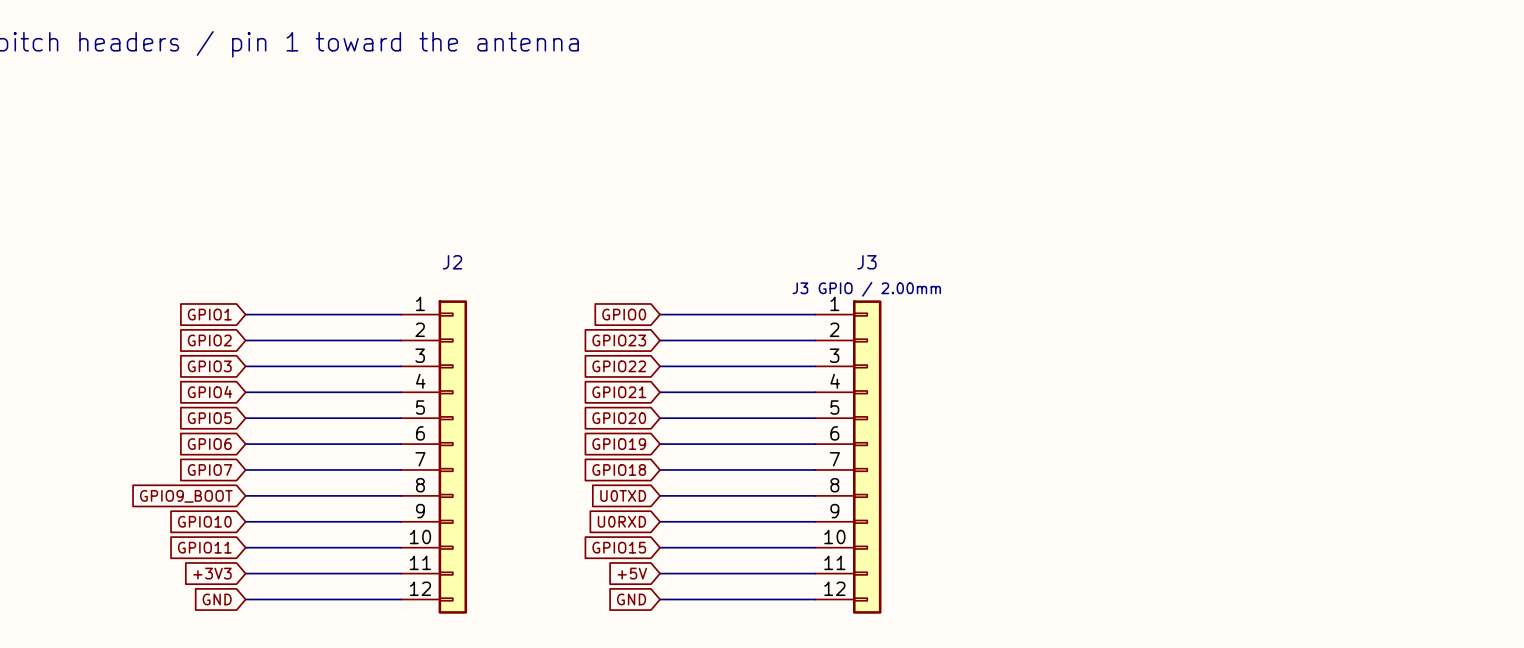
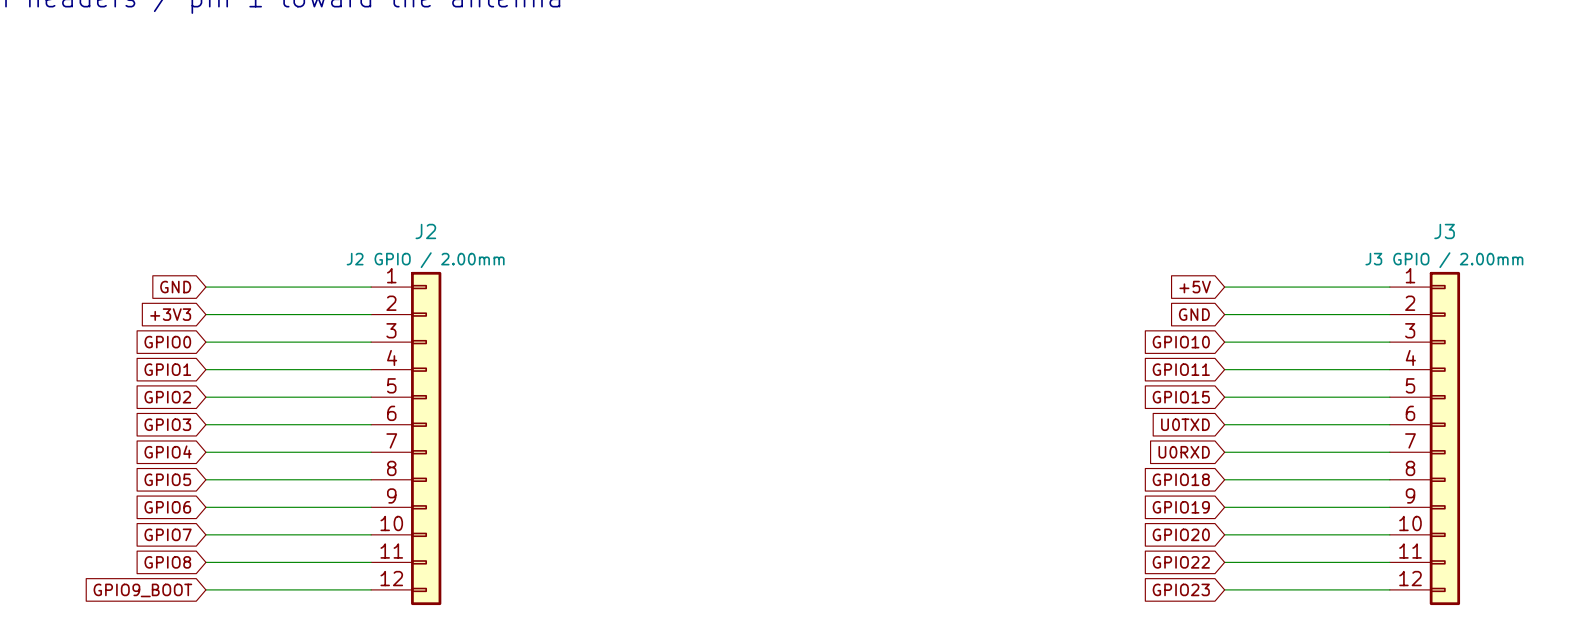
J2 value: none -> J2 GPIO / 2.00mm (425, 260)
global label: GPIO1 (209, 314) -> GND (175, 287)
global label: GPIO0 (624, 314) -> none
wire: (660, 314) (815, 314) -> none
global label: none -> +5V (1195, 287)
wire: none -> (1224, 287) (1389, 287)
global label: GPIO2 (209, 340) -> +3V3 (170, 314)
global label: GPIO23 (619, 340) -> none
wire: (660, 340) (815, 340) -> none
global label: none -> GND (1194, 314)
wire: none -> (1224, 314) (1389, 314)
global label: GPIO3 (209, 366) -> GPIO0 (167, 342)
global label: GPIO22 (619, 366) -> none
wire: (660, 366) (815, 366) -> none
global label: none -> GPIO10 (1181, 342)
wire: none -> (1224, 342) (1389, 342)
global label: GPIO4 (210, 392) -> GPIO1 (167, 369)
global label: GPIO21 (619, 392) -> none
wire: (660, 392) (815, 392) -> none
global label: none -> GPIO11 (1181, 369)
wire: none -> (1224, 369) (1389, 369)
global label: GPIO5 (209, 418) -> GPIO2 (167, 397)
global label: GPIO20 (619, 418) -> none
wire: (660, 418) (815, 418) -> none
global label: none -> GPIO15 (1181, 397)
wire: none -> (1224, 397) (1389, 397)
global label: GPIO6 (209, 444) -> GPIO3 (167, 424)
global label: GPIO19 (619, 444) -> none
wire: (660, 444) (815, 444) -> none
global label: none -> U0TXD (1185, 424)
wire: none -> (1224, 424) (1389, 424)
J3 position: (848, 457) -> (1424, 438)
global label: GPIO7 (210, 469) -> GPIO4 (168, 451)
global label: GPIO18 (619, 469) -> none
wire: (660, 469) (815, 469) -> none
global label: none -> U0RXD (1184, 452)
wire: none -> (1224, 452) (1389, 452)
global label: U0TXD (623, 495) -> none
wire: (660, 495) (815, 495) -> none
global label: none -> GPIO18 (1181, 479)
wire: none -> (1224, 479) (1389, 479)
global label: GPIO9_BOOT (186, 496) -> GPIO5 (167, 479)
global label: GPIO10 (204, 521) -> GPIO6 (167, 507)
global label: U0RXD (621, 521) -> none
wire: (660, 521) (815, 521) -> none
global label: none -> GPIO19 (1181, 507)
wire: none -> (1224, 507) (1389, 507)
global label: GPIO11 (204, 547) -> GPIO7 (168, 534)
global label: GPIO15 (619, 547) -> none
wire: (660, 547) (815, 547) -> none
global label: none -> GPIO20 (1181, 534)
wire: none -> (1224, 534) (1389, 534)
global label: +3V3 (212, 573) -> GPIO8 (167, 562)
global label: +5V (632, 573) -> none
wire: (660, 573) (815, 573) -> none
global label: none -> GPIO22 (1181, 562)
wire: none -> (1224, 562) (1389, 562)
global label: GND (217, 599) -> GPIO9_BOOT (142, 590)
global label: GND (631, 599) -> none
wire: (660, 599) (815, 599) -> none
global label: none -> GPIO23 (1181, 589)
wire: none -> (1224, 589) (1389, 589)

